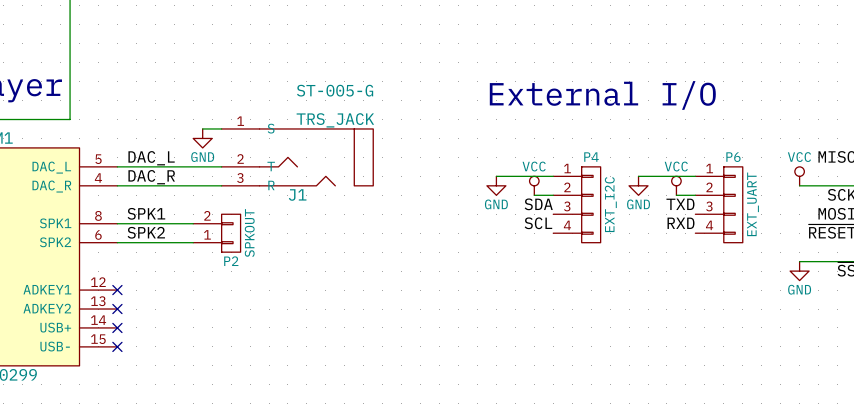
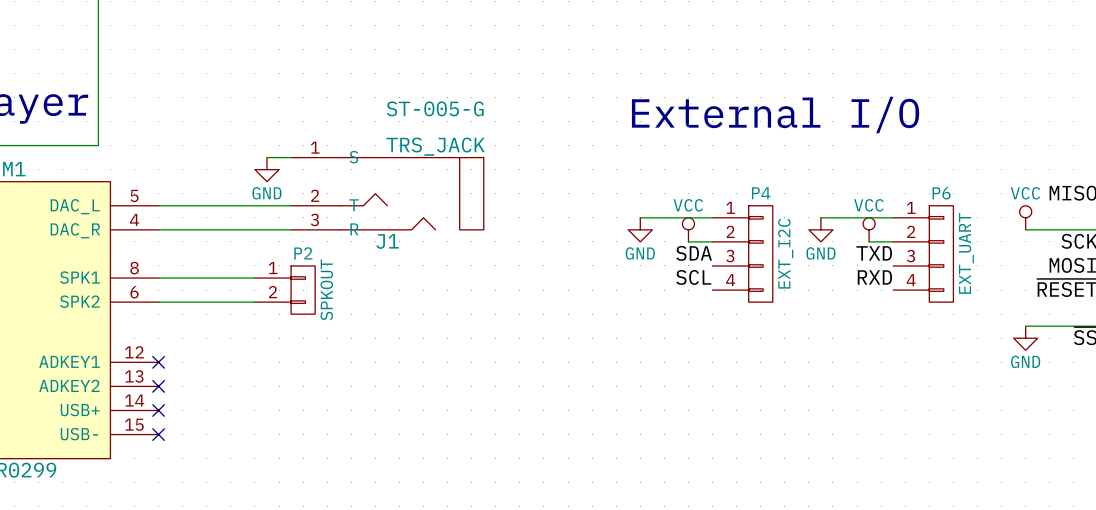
label: DAC_L (151, 158) -> none
label: DAC_R (151, 177) -> none
label: SPK1 (146, 213) -> none
label: SPK2 (146, 232) -> none
P2 flip: as is (231, 233) -> up-down (303, 290)

